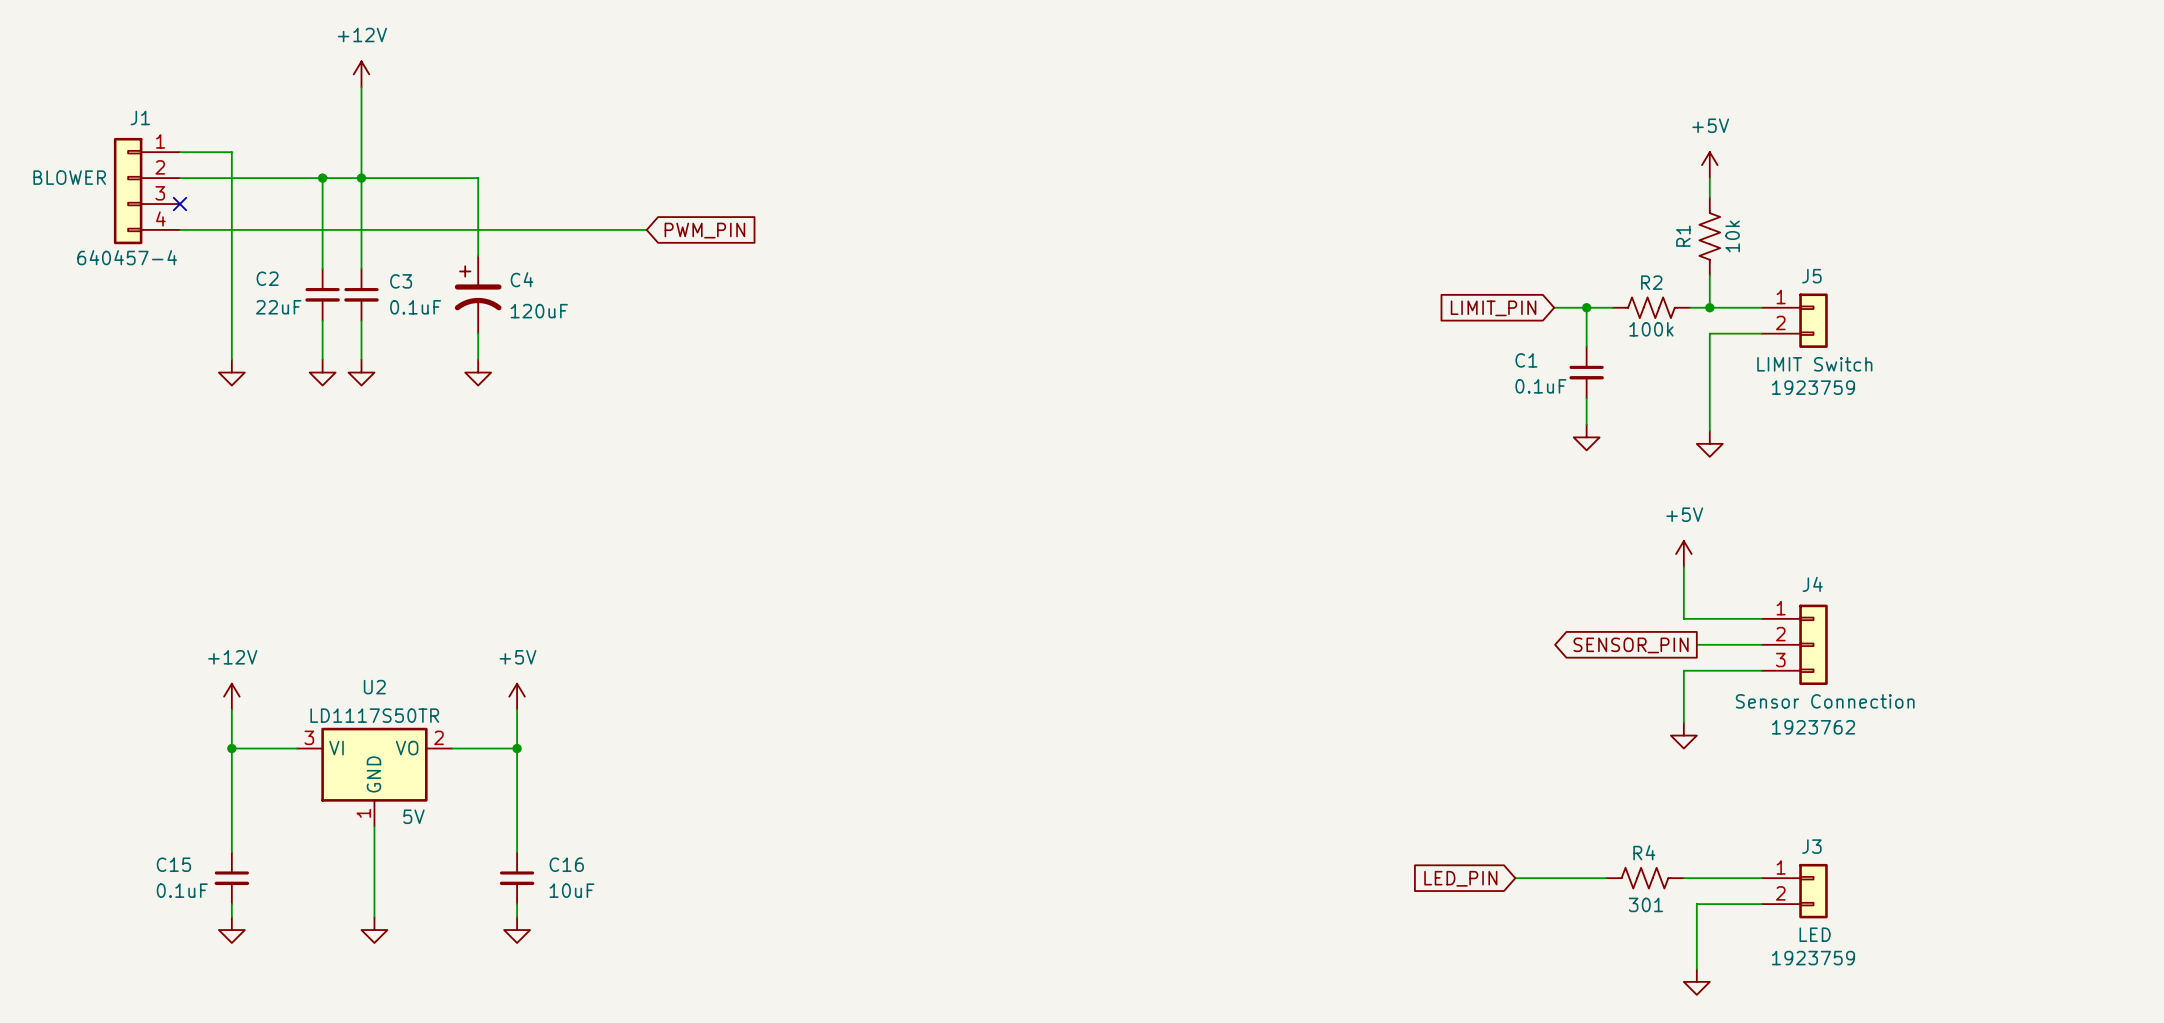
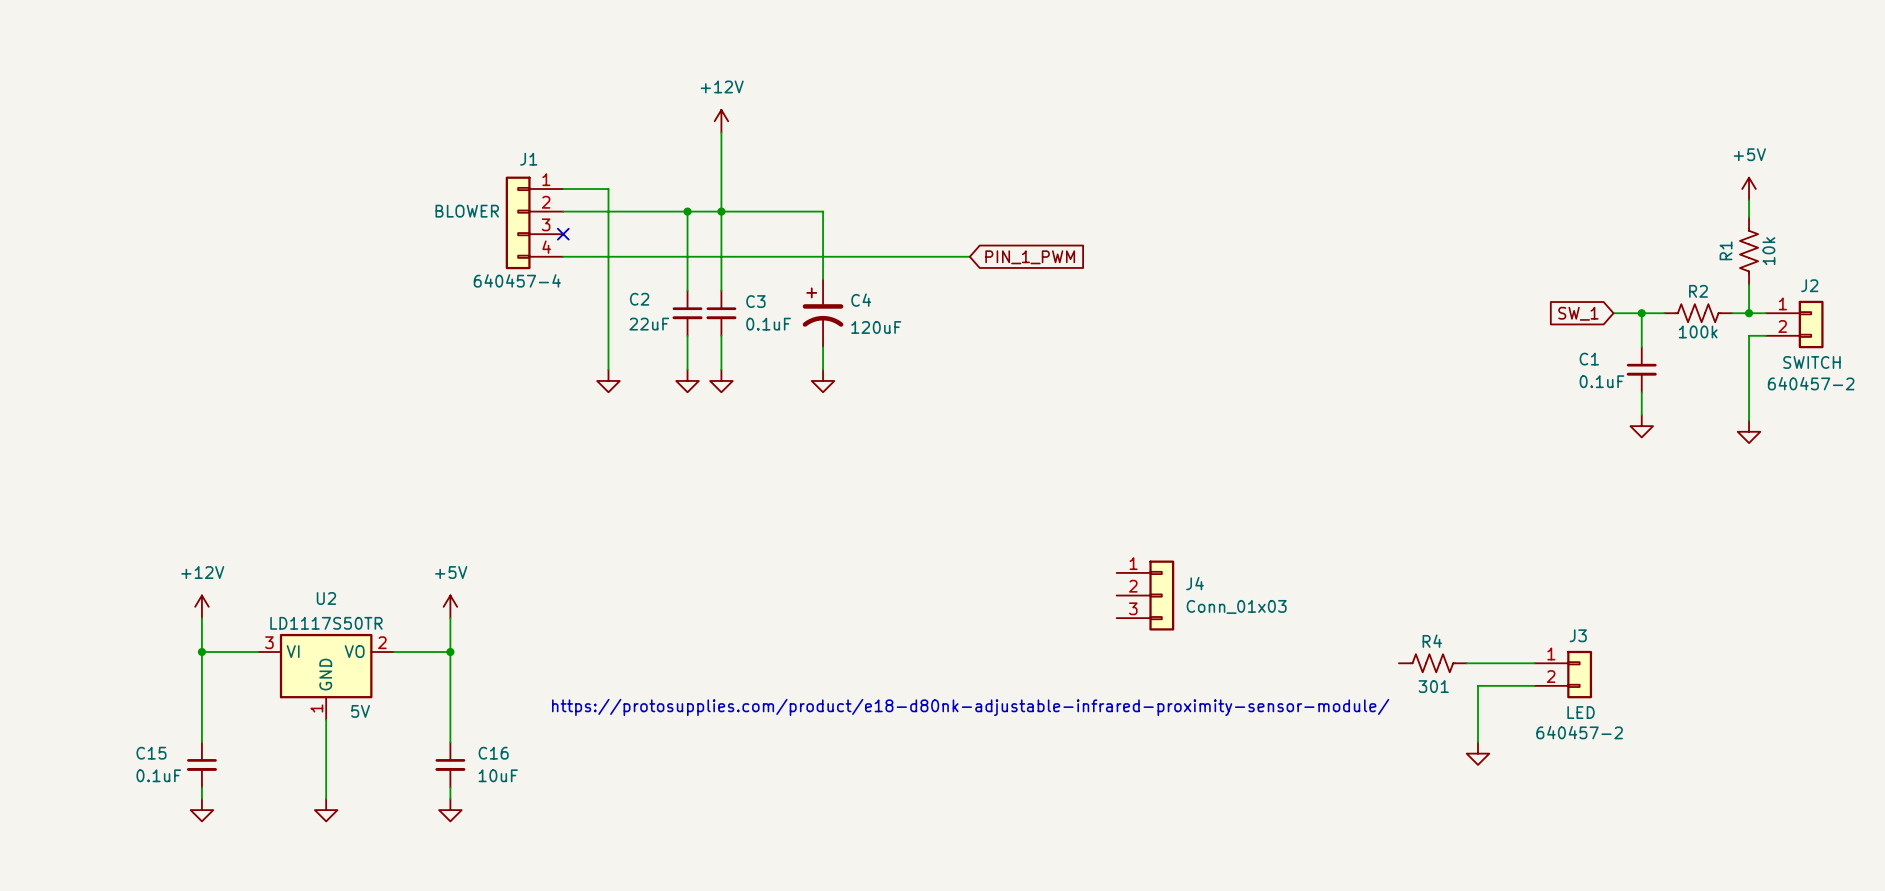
power symbol: +12V (361, 74) -> none
wire: (361, 87) (361, 268) -> none
power symbol: none -> +12V (721, 121)
wire: (179, 152) (231, 152) (231, 359) -> none
wire: none -> (721, 132) (721, 290)
power symbol: +5V (1709, 165) -> none
wire: (179, 178) (478, 178) (478, 255) -> none
wire: (322, 178) (322, 268) -> none
junction: (322, 178) -> none
junction: (361, 178) -> none
wire: (1709, 178) (1709, 197) -> none
J1 position: (146, 191) -> (534, 222)
no-connect mark: (179, 204) -> none
wire: none -> (563, 189) (608, 189) (608, 369)
power symbol: none -> +5V (1749, 189)
wire: (179, 229) (646, 229) -> none
wire: none -> (1749, 200) (1749, 217)
global label: PWM_PIN (704, 230) -> none
R1 position: (1709, 236) -> (1749, 251)
wire: none -> (563, 211) (823, 211) (823, 279)
wire: none -> (687, 211) (687, 290)
junction: none -> (687, 211)
junction: none -> (721, 211)
no-connect mark: none -> (563, 234)
wire: (1709, 275) (1709, 307) -> none
C2 position: (322, 294) -> (687, 313)
C3 position: (361, 294) -> (721, 313)
C4 position: (478, 294) -> (823, 313)
wire: none -> (563, 256) (969, 256)
global label: none -> PIN_1_PWM (1030, 257)
wire: (1554, 307) (1612, 307) -> none
wire: (1586, 307) (1586, 346) -> none
junction: (1586, 307) -> none
R2 position: (1651, 307) -> (1698, 313)
wire: (1690, 307) (1761, 307) -> none
junction: (1709, 307) -> none
global label: LIMIT_PIN (1493, 308) -> none
wire: (322, 320) (322, 359) -> none
wire: (361, 320) (361, 359) -> none
J5: LIMIT Switch (1794, 320) -> none
wire: none -> (1749, 284) (1749, 313)
wire: (478, 333) (478, 359) -> none
wire: (1761, 333) (1709, 333) (1709, 430) -> none
wire: none -> (1613, 313) (1664, 313)
wire: none -> (1641, 313) (1641, 347)
junction: none -> (1641, 313)
wire: none -> (1732, 313) (1765, 313)
junction: none -> (1749, 313)
global label: none -> SW_1 (1578, 313)
power symbol: (231, 372) -> none
power symbol: (322, 372) -> none
power symbol: (361, 372) -> none
power symbol: (478, 372) -> none
C1 position: (1586, 372) -> (1641, 369)
J2: none -> SWITCH (1794, 324)
wire: none -> (687, 335) (687, 369)
wire: none -> (721, 335) (721, 369)
wire: none -> (1765, 335) (1749, 335) (1749, 420)
wire: none -> (823, 347) (823, 369)
wire: (1586, 398) (1586, 424) -> none
power symbol: none -> (608, 380)
power symbol: none -> (687, 380)
power symbol: none -> (721, 380)
power symbol: none -> (823, 380)
power symbol: (1586, 437) -> none
power symbol: (1709, 443) -> none
wire: none -> (1641, 392) (1641, 414)
power symbol: none -> (1641, 426)
power symbol: none -> (1749, 431)
power symbol: +5V (1683, 554) -> none
wire: (1683, 567) (1683, 618) (1761, 618) -> none
J4 name position: J4 (1812, 584) -> J4 (1194, 583)
wire: (1696, 644) (1761, 644) -> none
J4 position: (1794, 644) -> (1145, 595)
global label: SENSOR_PIN (1631, 645) -> none
wire: (1761, 670) (1683, 670) (1683, 722) -> none
J4 value: Sensor Connection (1825, 701) -> Conn_01x03 (1236, 606)
J4 text: 1923762 (1813, 727) -> none
power symbol: (1683, 735) -> none
text: none -> https://protosupplies.com/product/e18-d80nk-adjustable-infrared-proximity-sensor-module/ (970, 707)
power symbol: none -> (1478, 753)
global label: LED_PIN (1460, 878) -> none
wire: (1515, 878) (1606, 878) -> none
R4 position: (1644, 878) -> (1432, 663)
wire: (1683, 878) (1761, 878) -> (1466, 663) (1534, 663)
J3 position: (1794, 891) -> (1563, 674)
wire: (1761, 904) (1696, 904) (1696, 968) -> (1534, 685) (1478, 685) (1478, 742)
J3 text: 1923759 (1813, 958) -> 640457-2 (1579, 732)
power symbol: (1696, 981) -> none

